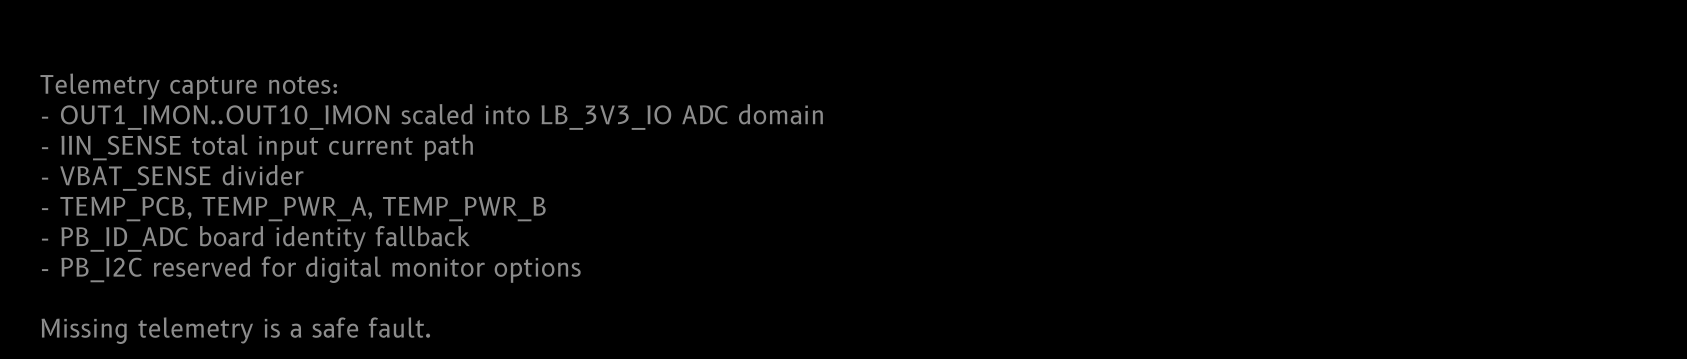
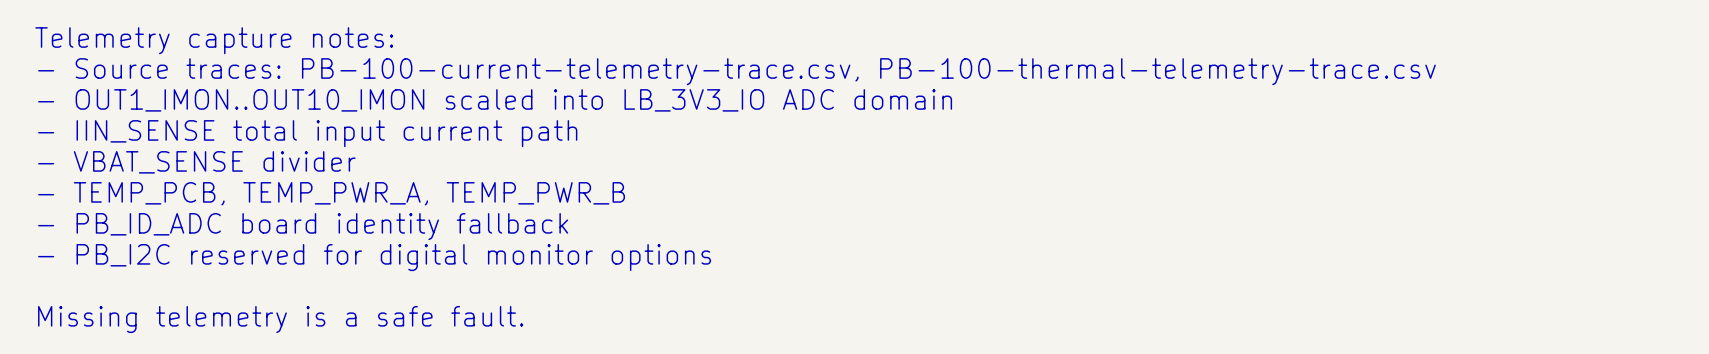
text: none -> Telemetry capture notes: (214, 40)
text: Telemetry capture notes: (188, 86) -> - Source traces: PB-100-current-telemetry-trace.csv, PB-100-thermal-telemetry-trace.csv (736, 71)

